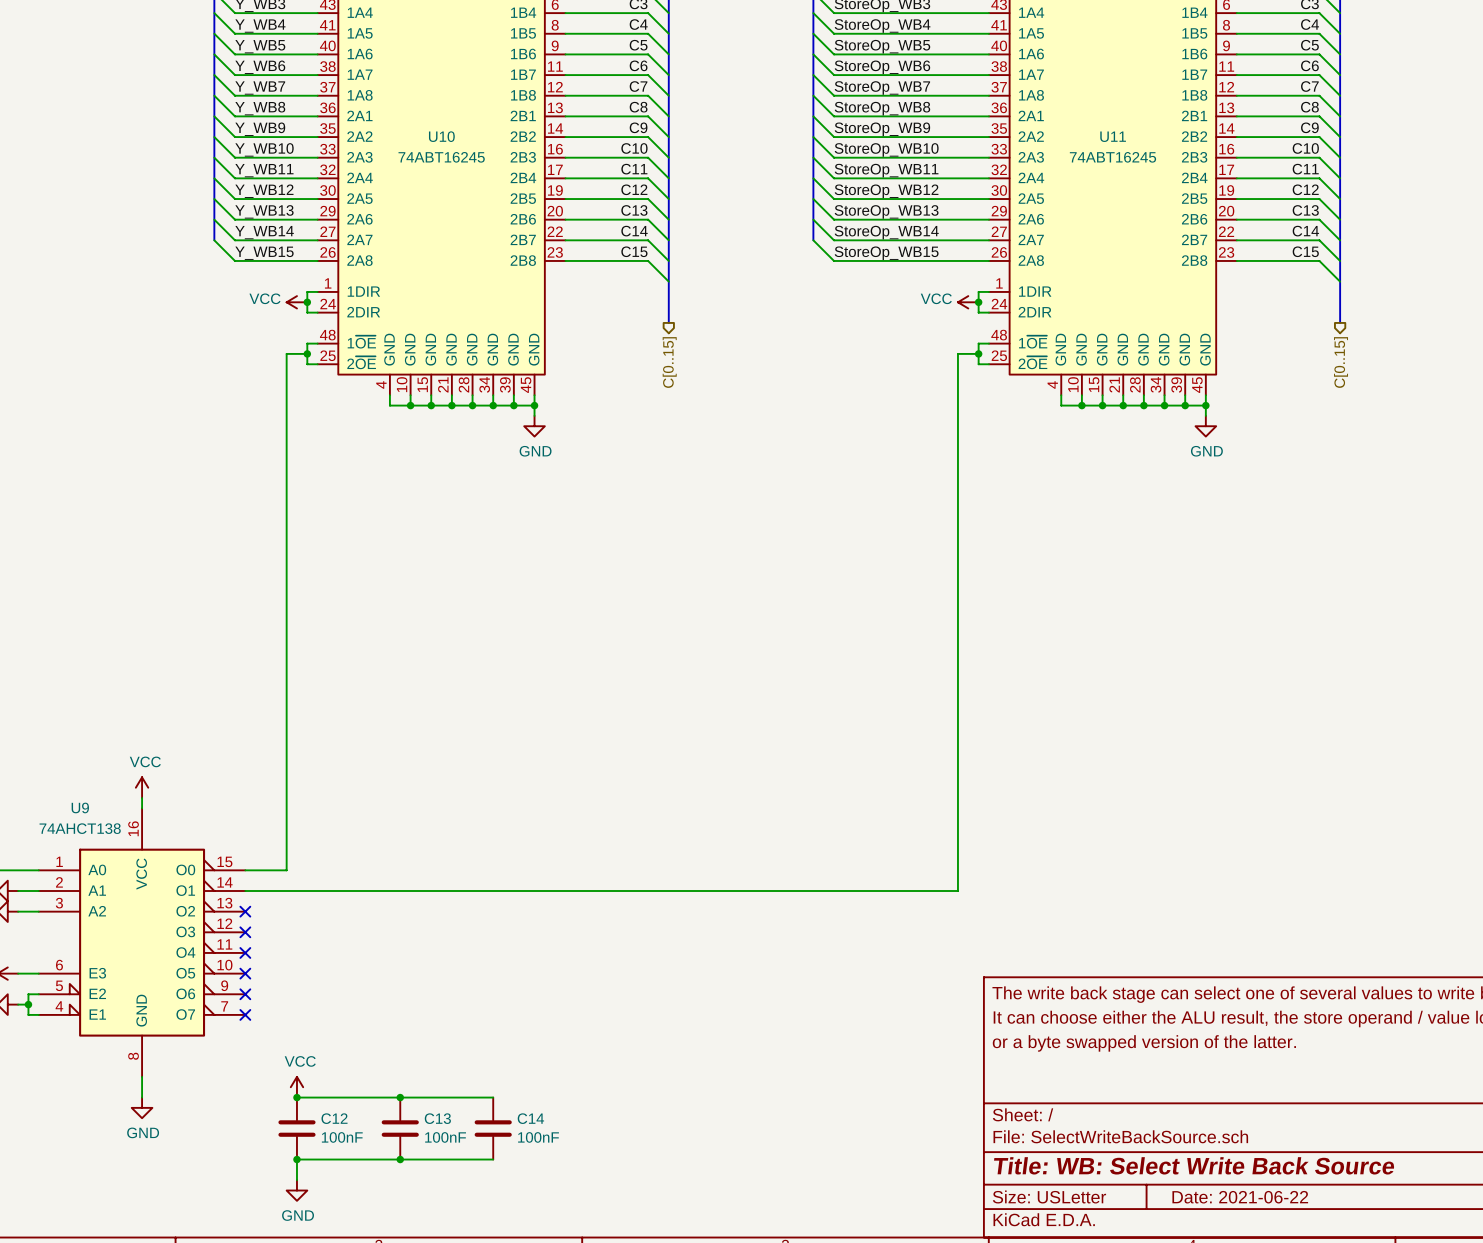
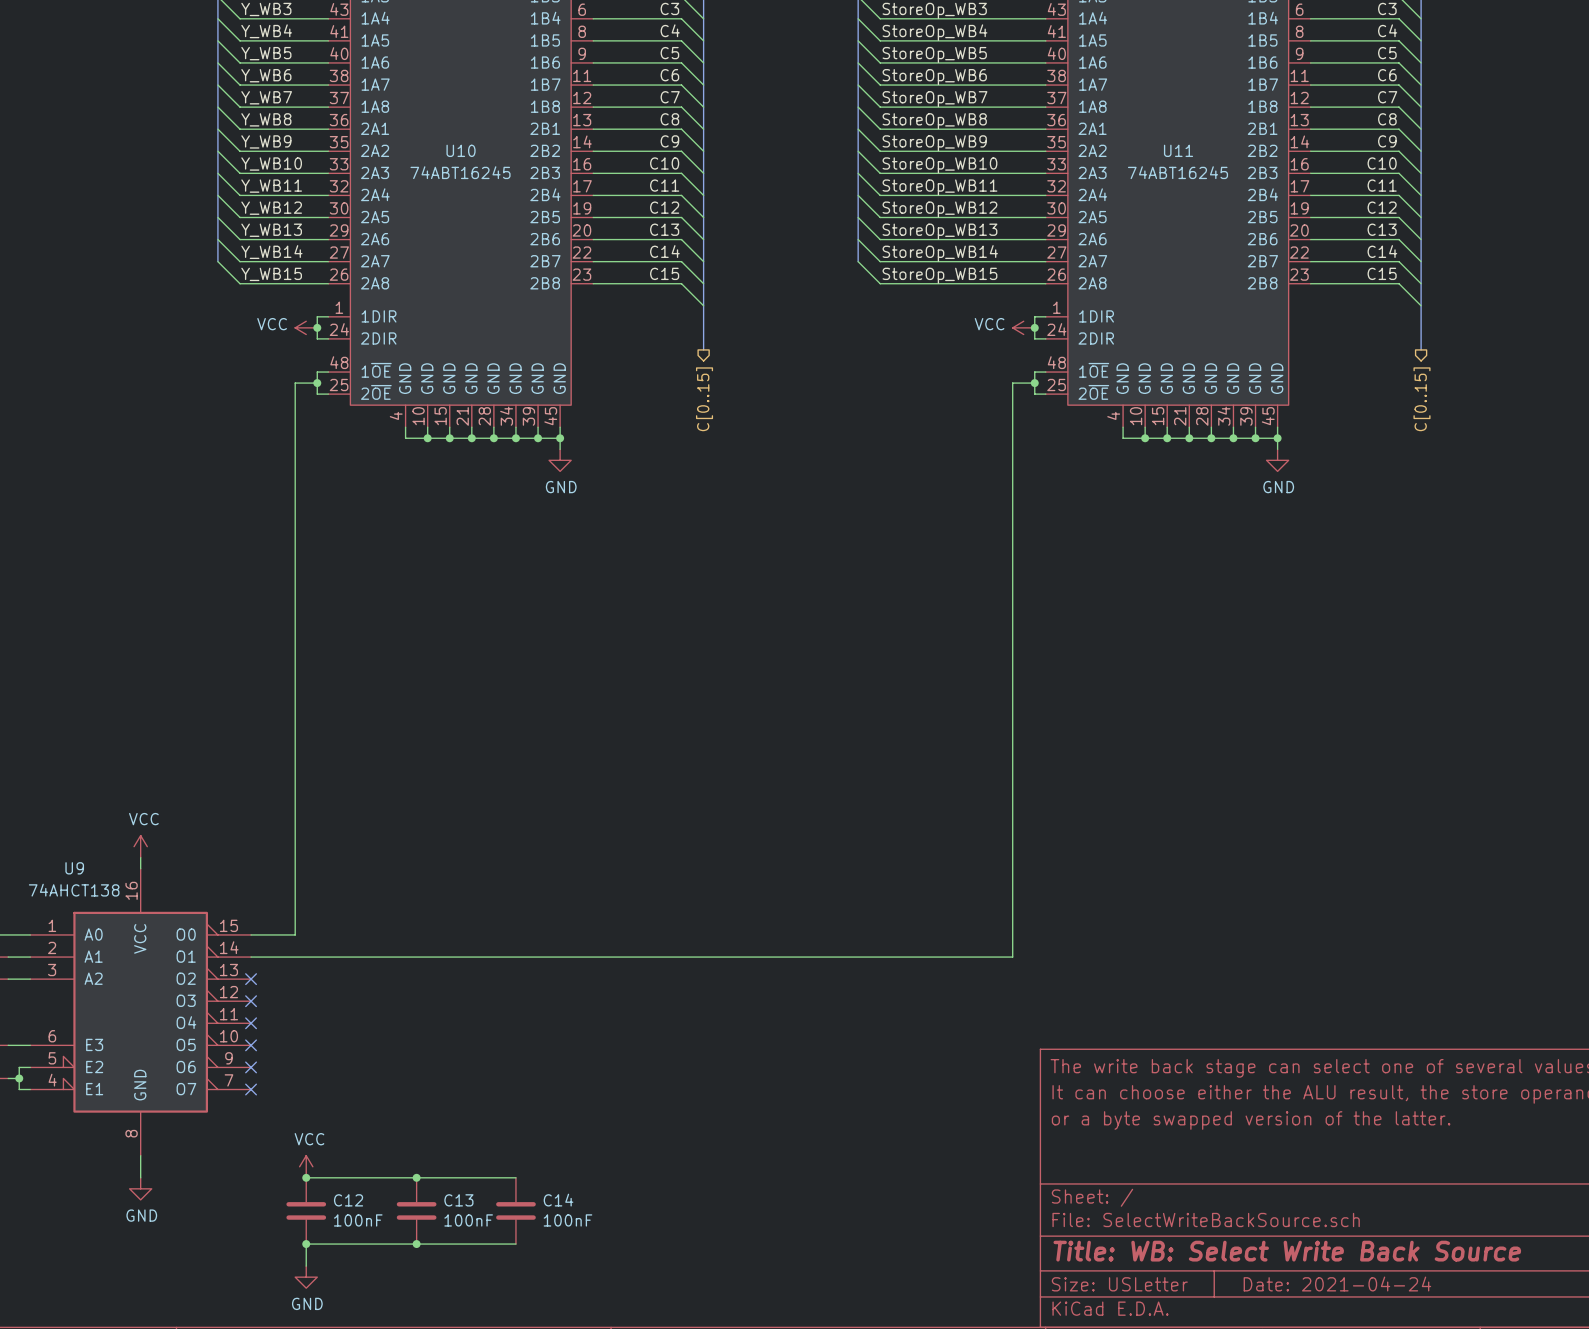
title block: Date: 2021-06-22 (1240, 1197) -> Date: 2021-04-24 (1337, 1284)

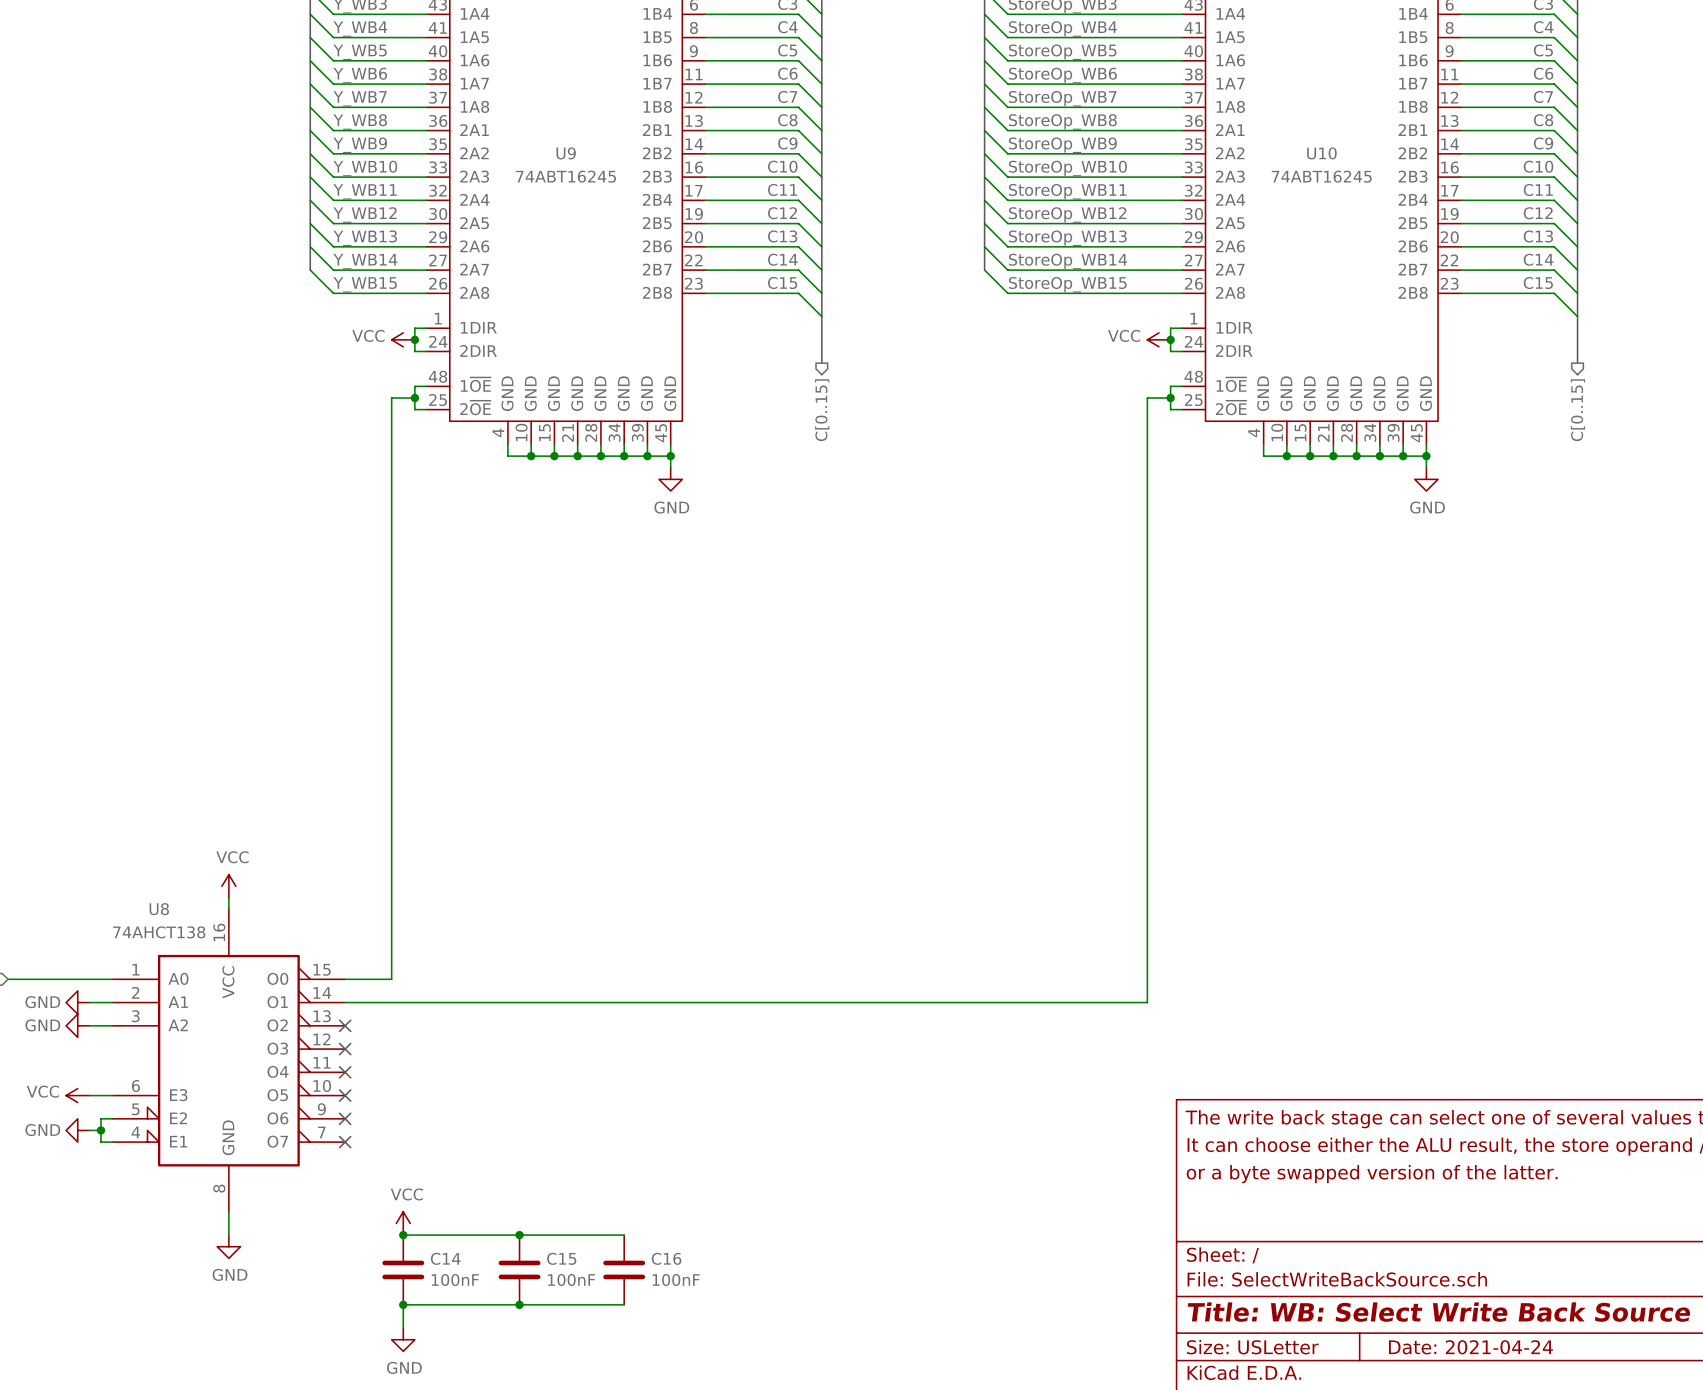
U10 name: U10 (461, 150) -> U9 (566, 153)
U11 name: U11 (1178, 150) -> U10 (1321, 153)
U9 name: U9 (74, 868) -> U8 (159, 909)
C12 name: C12 (348, 1200) -> C14 (445, 1258)
C13 name: C13 (458, 1200) -> C15 (561, 1258)
C14 name: C14 (558, 1200) -> C16 (666, 1258)

